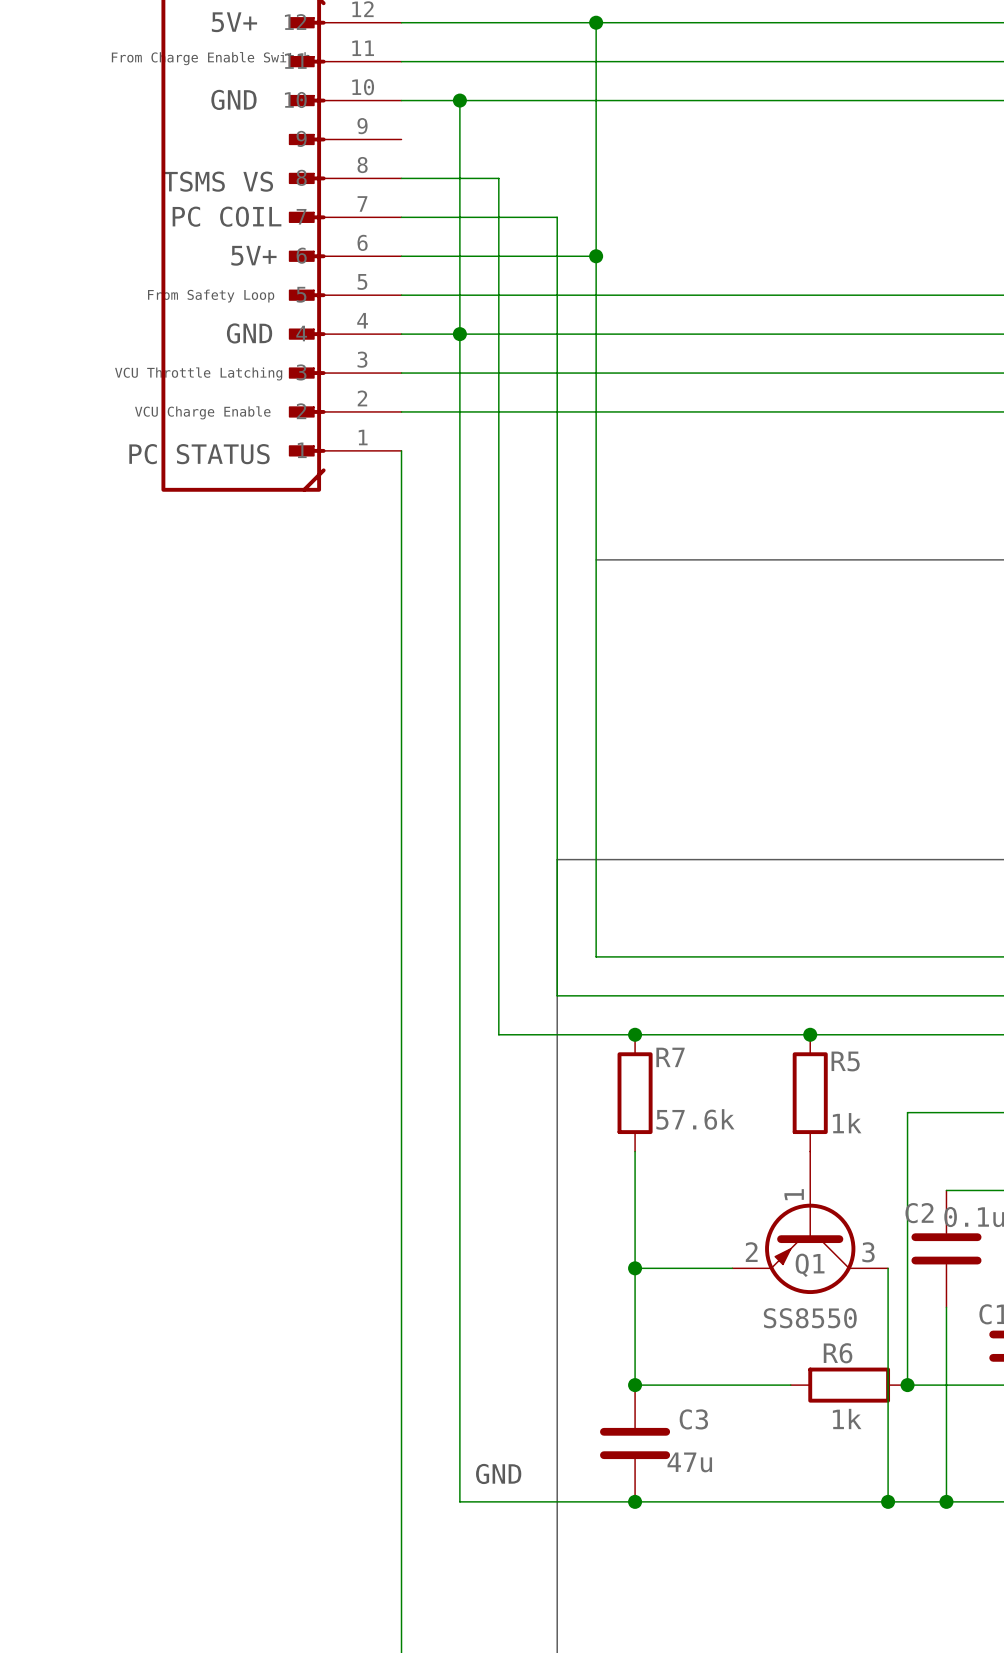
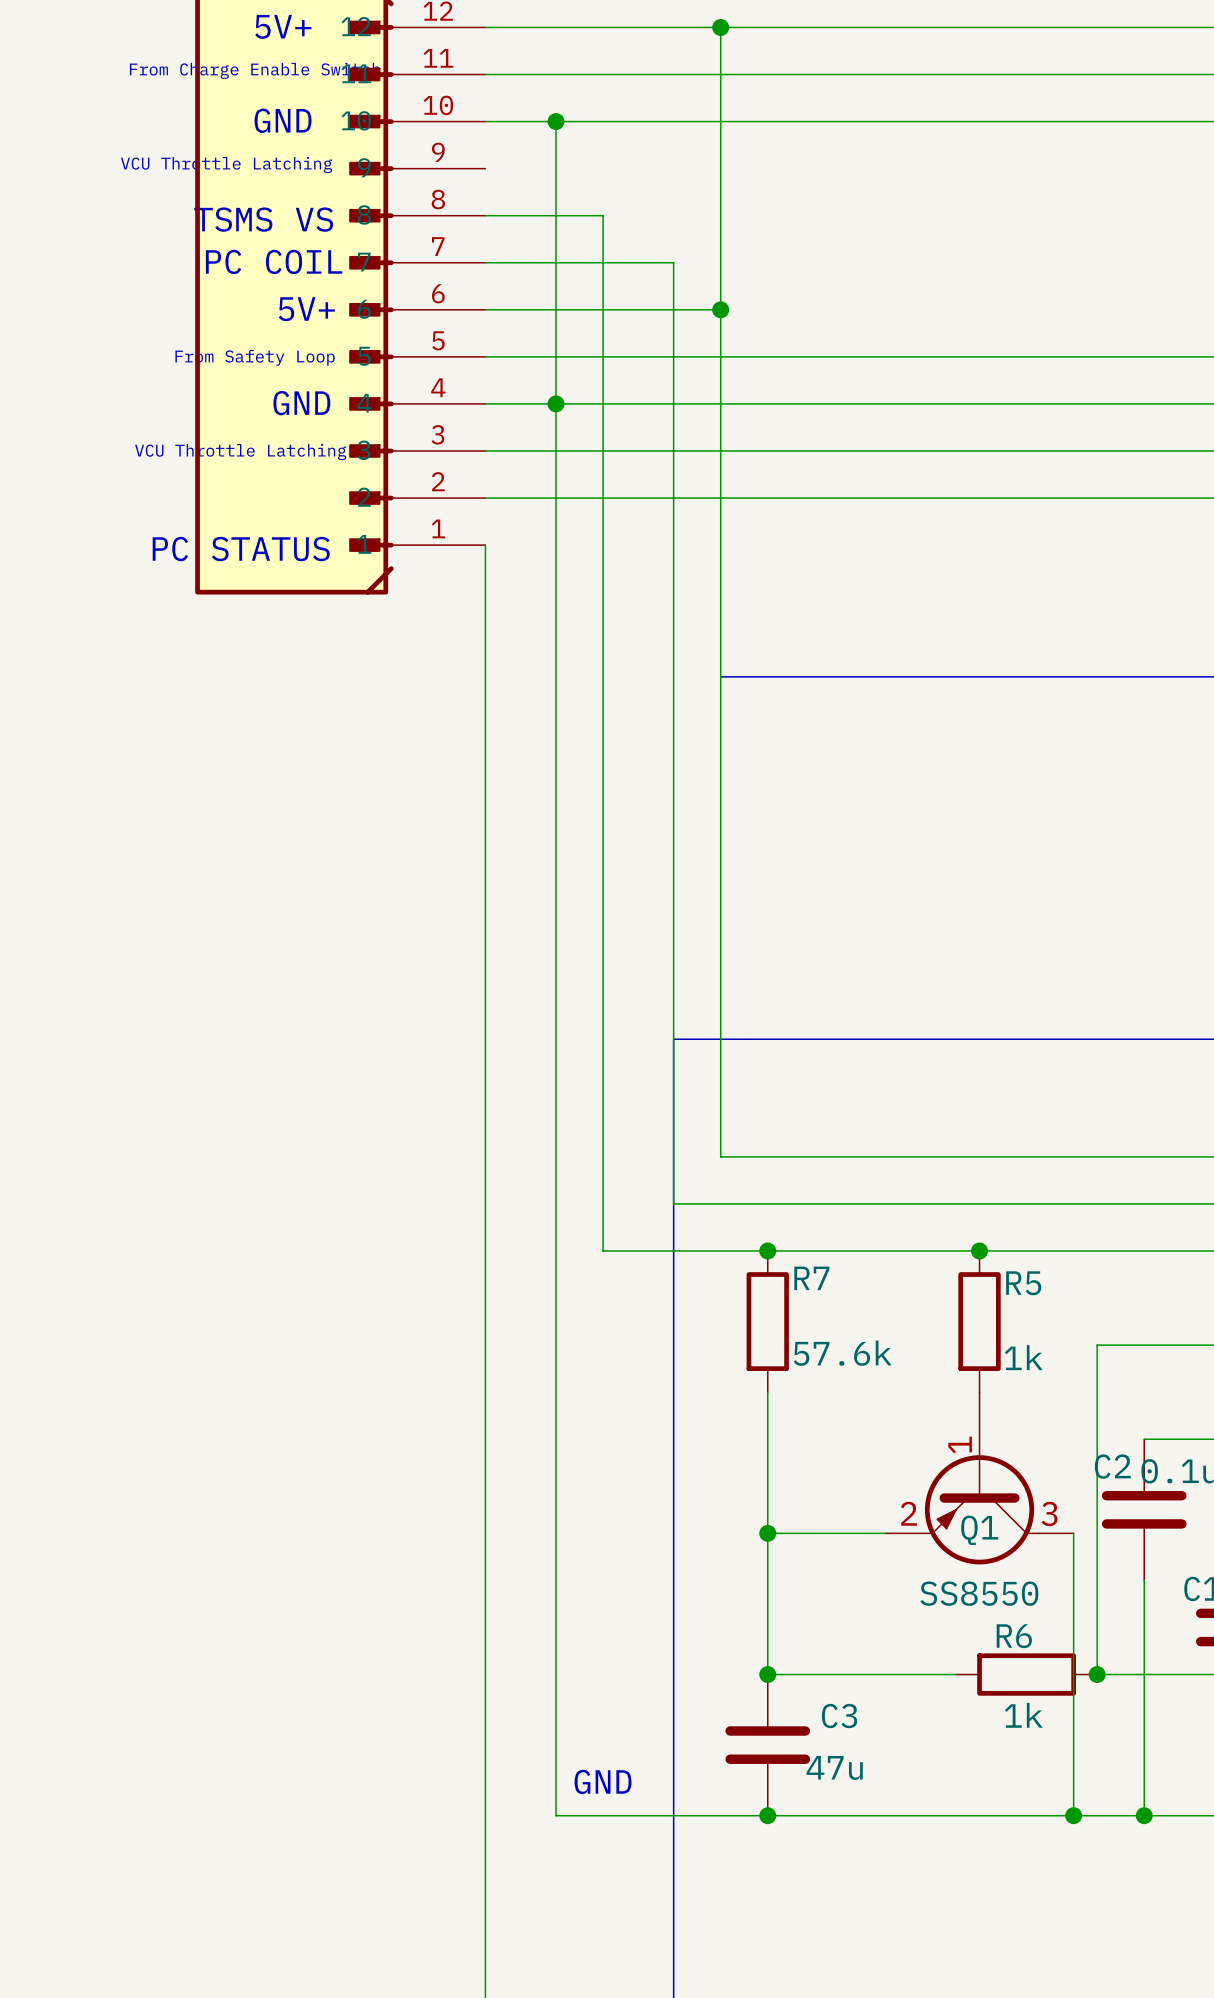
text: none -> VCU Throttle Latching (226, 164)
text: VCU Charge Enable (202, 412) -> none

